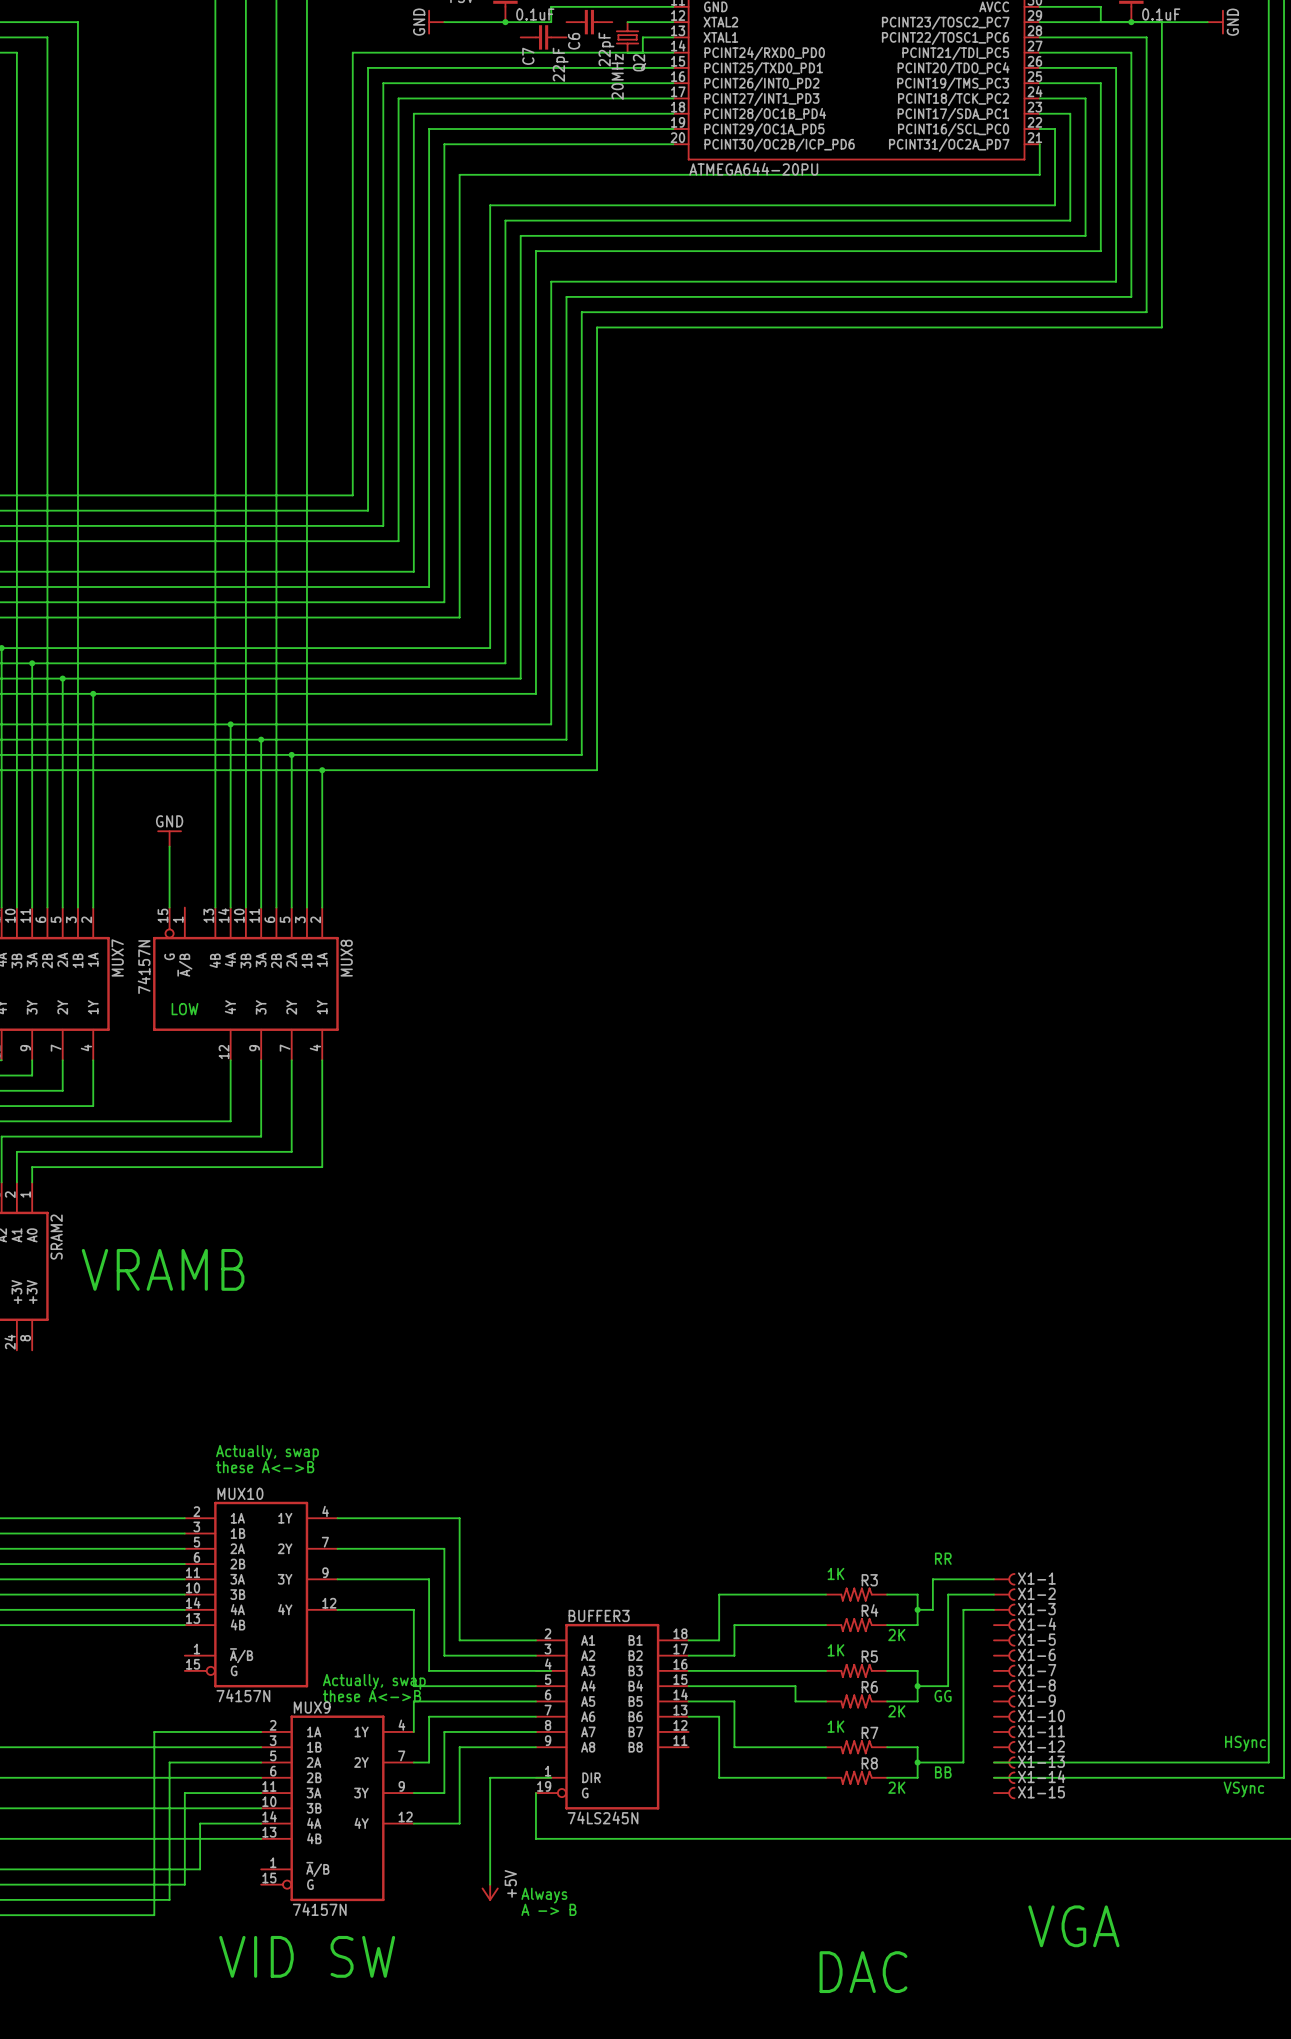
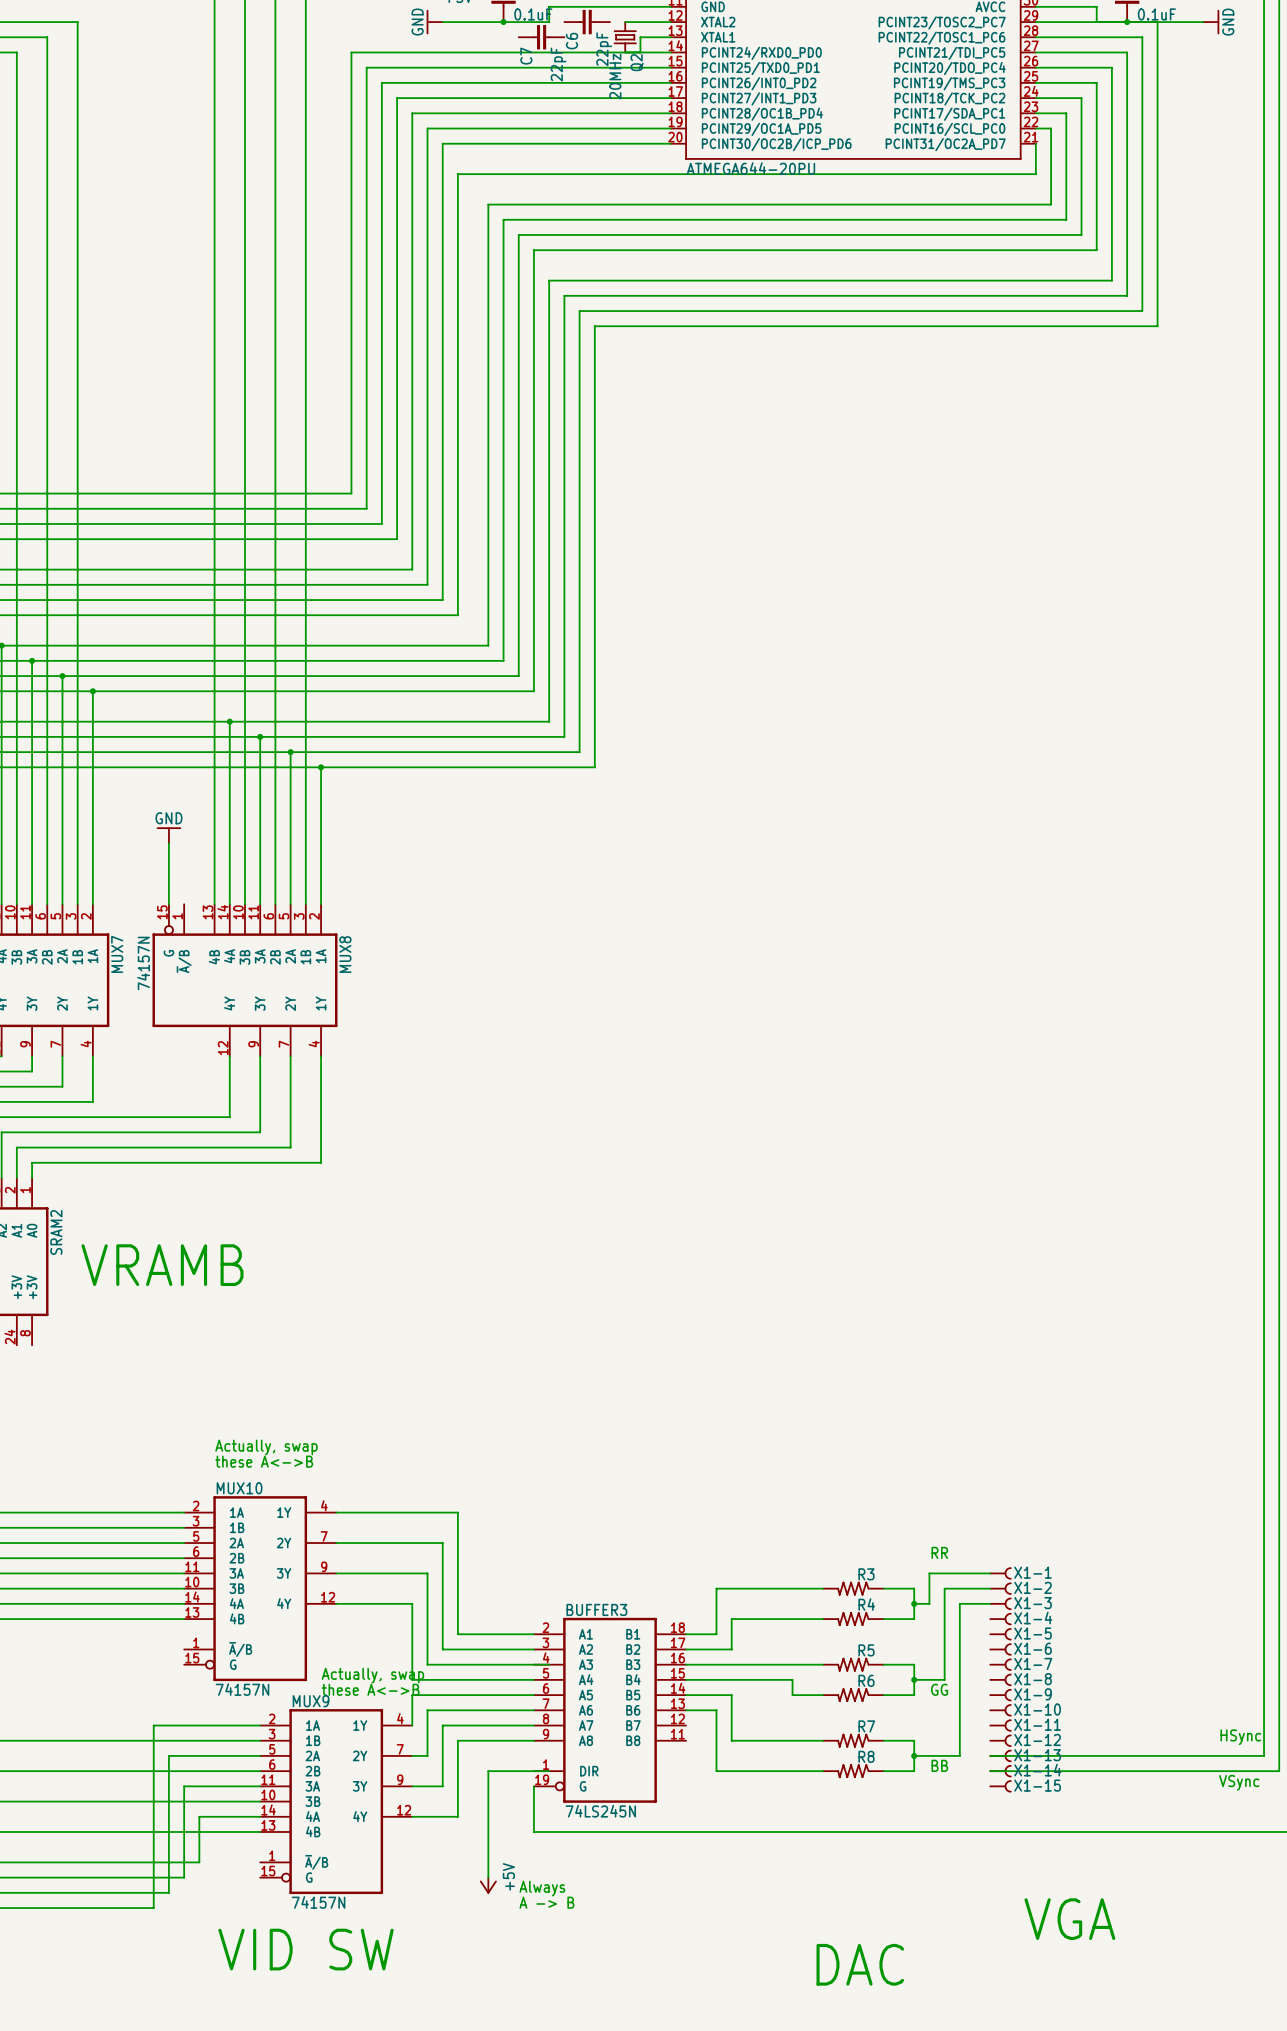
text: LOW (185, 1009) -> none
text: 1K (835, 1573) -> none
text: 2K (896, 1635) -> none
text: 1K (835, 1650) -> none
text: 2K (896, 1711) -> none
text: 1K (835, 1726) -> none
text: 2K (896, 1787) -> none

